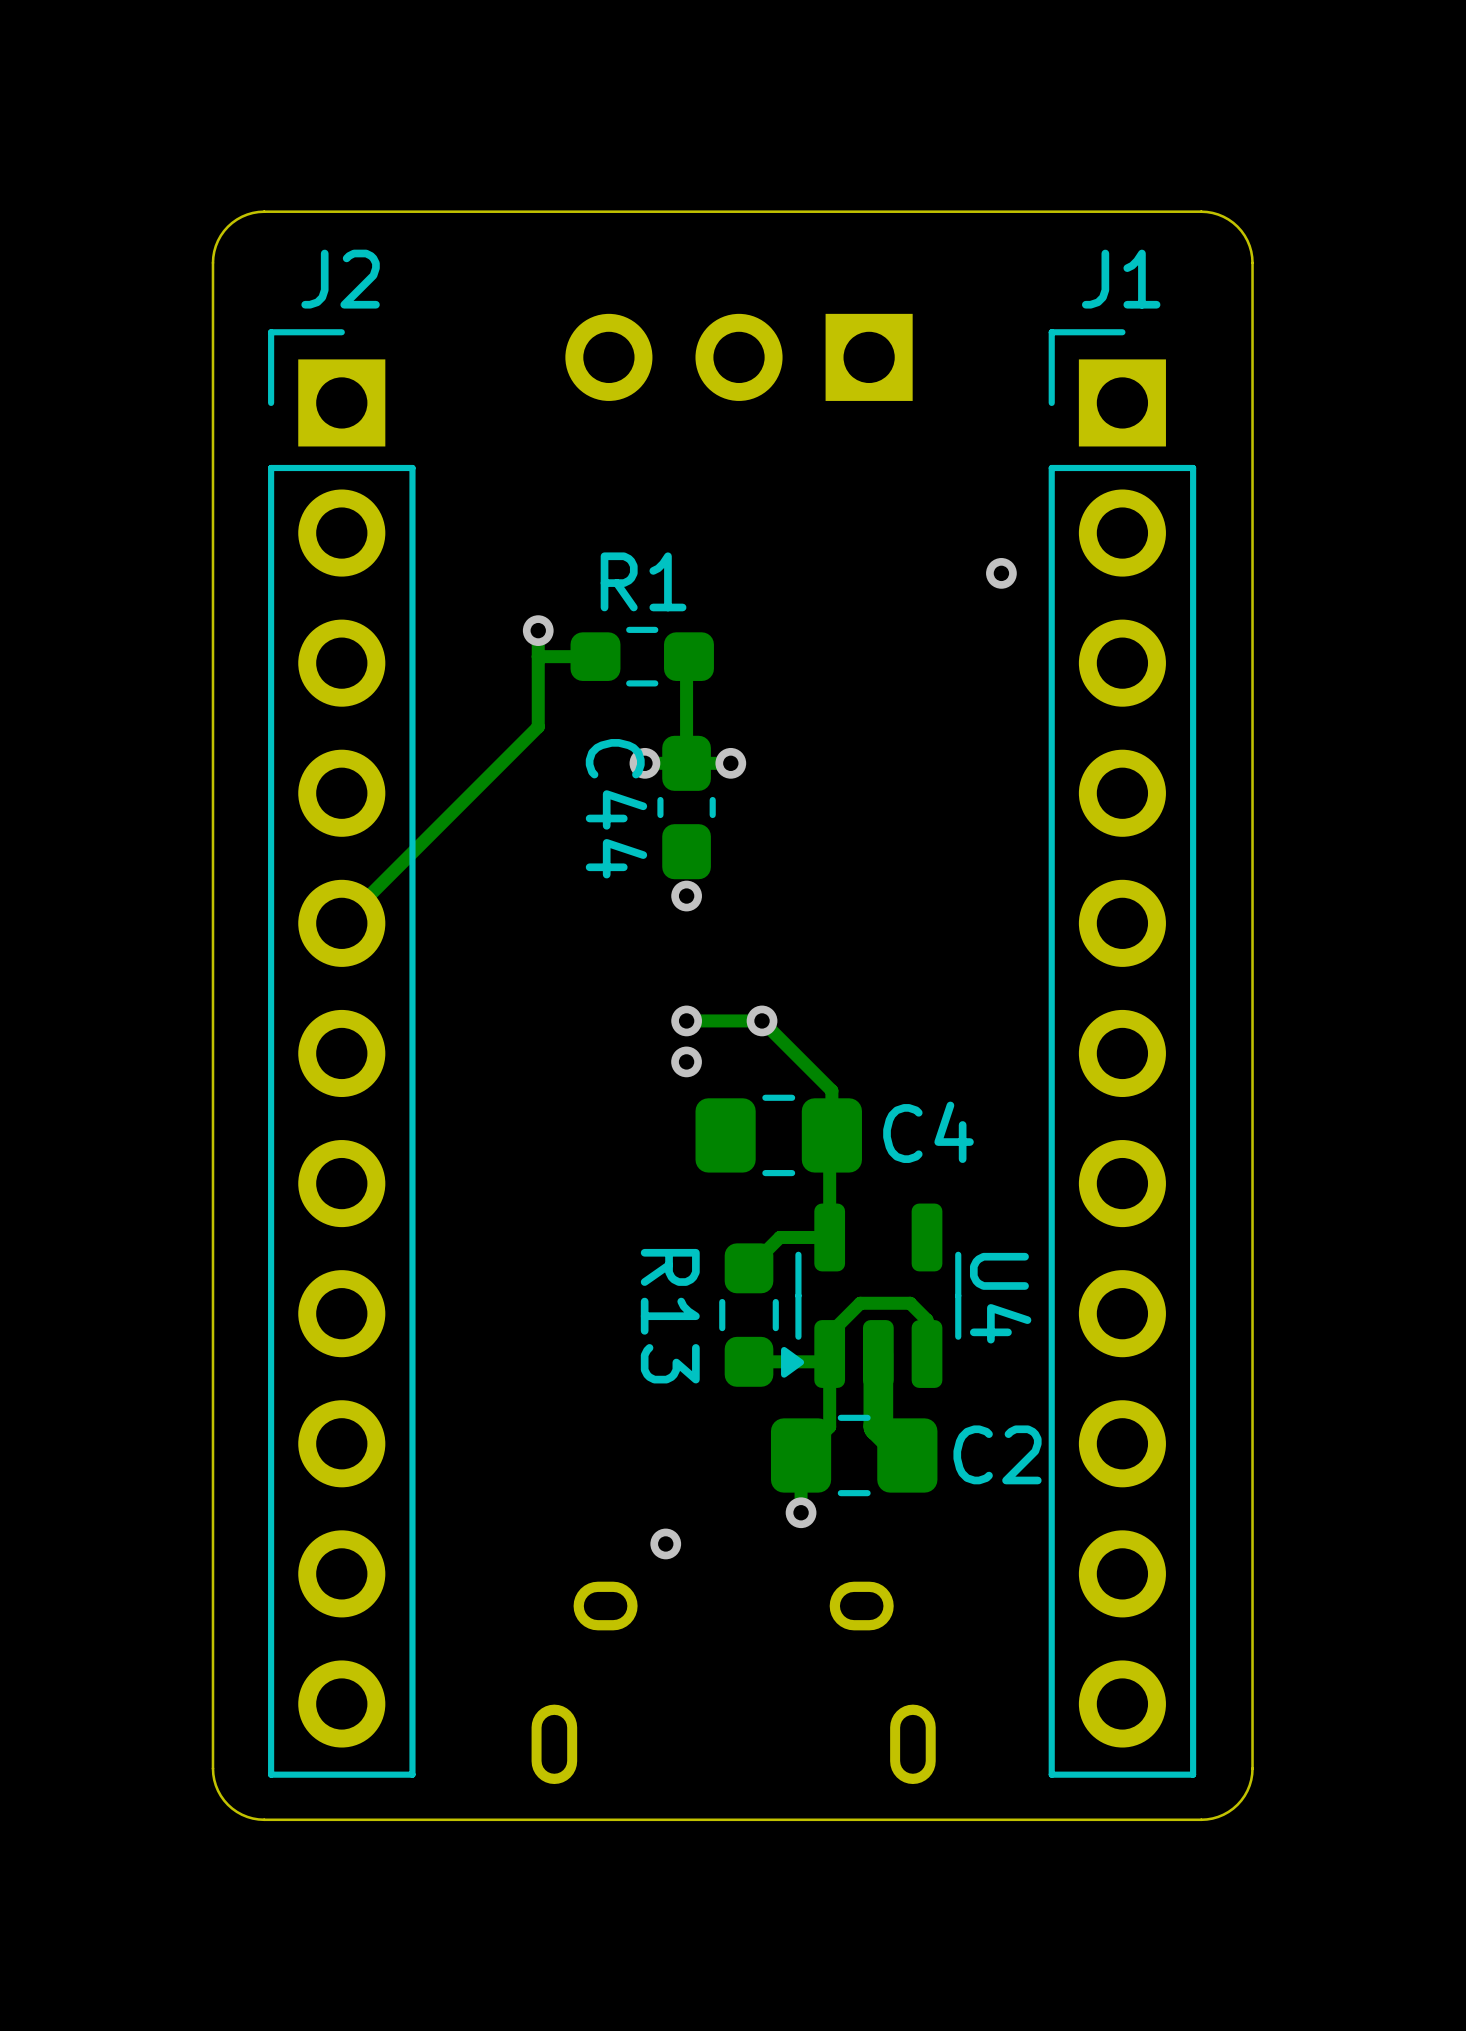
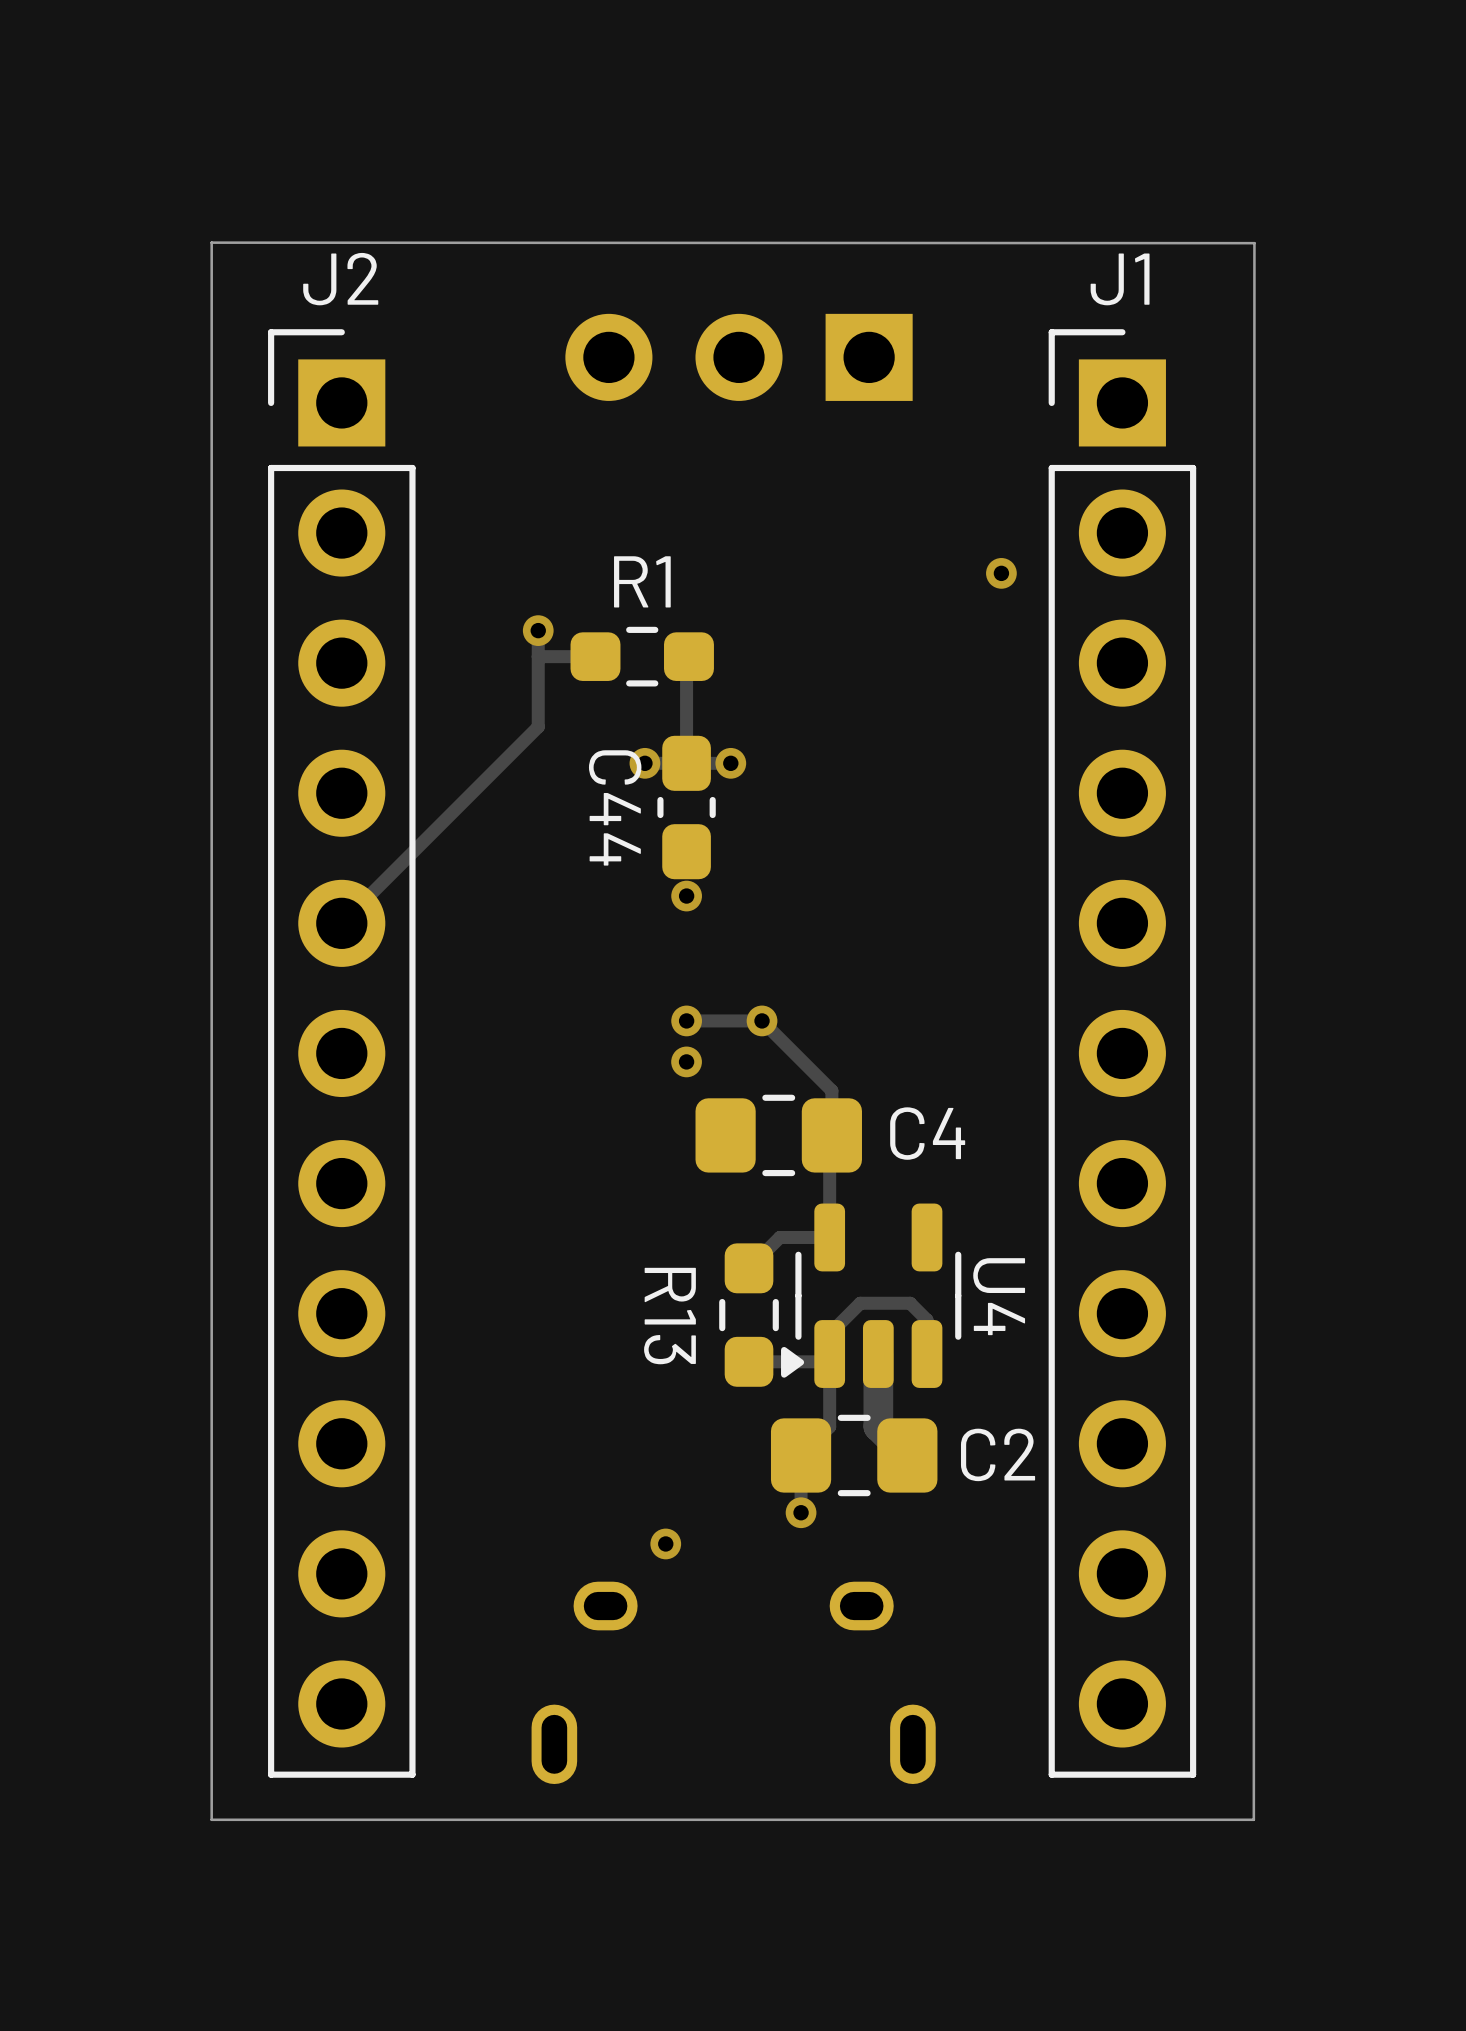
board edge: (1201, 1819) (1223, 1814) (1237, 1804) (1247, 1790) (1252, 1768) (1252, 262) (1249, 245) (1237, 226) (1218, 214) (1201, 211) (264, 211) (241, 216) (227, 226) (220, 235) (214, 251) (212, 262) (212, 1768) (215, 1785) (227, 1804) (241, 1814) (264, 1819) -> (1201, 1819) (1253, 1819) (1254, 243) (211, 242) (211, 1819) (264, 1819)

